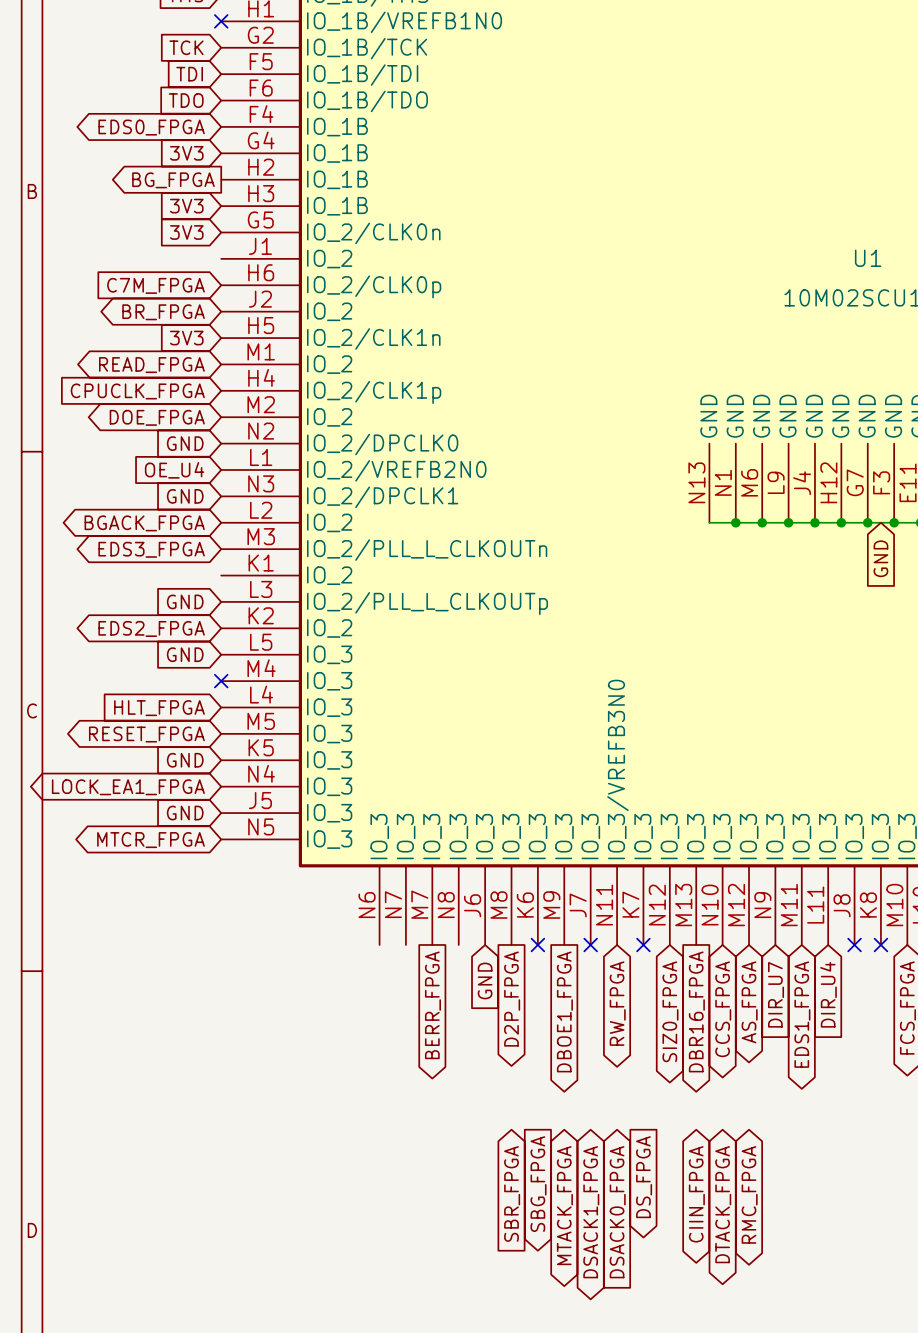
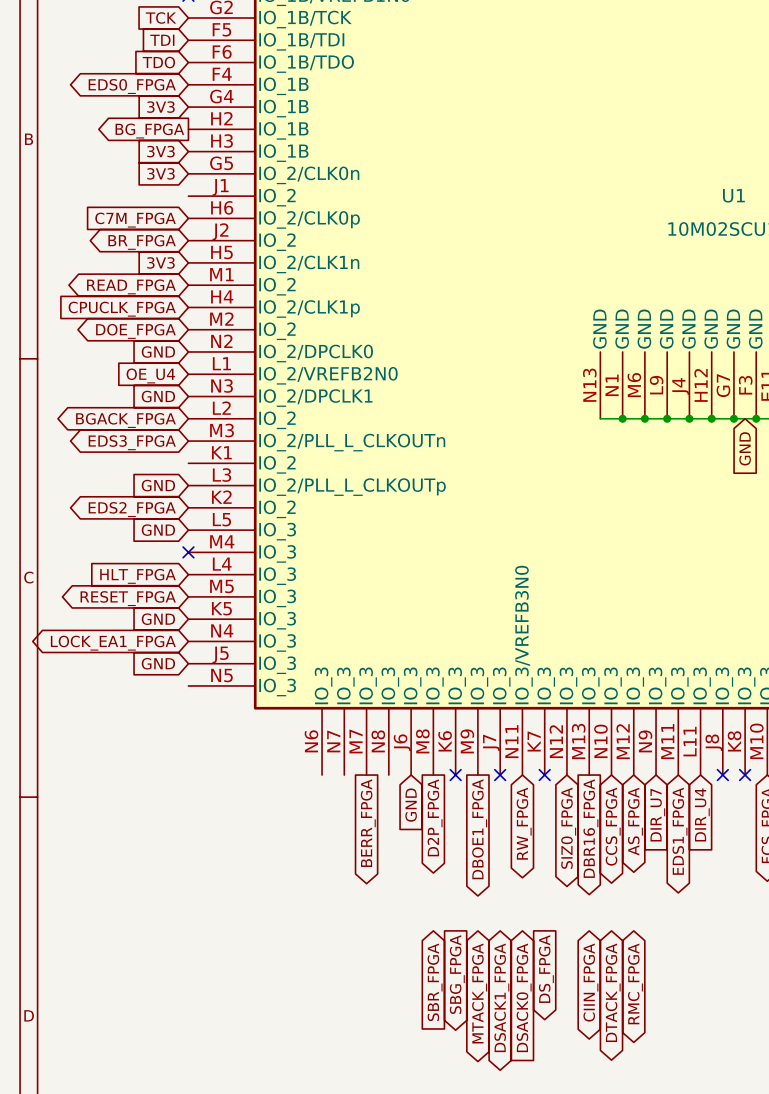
global label: MTCR_FPGA (150, 840) -> none

